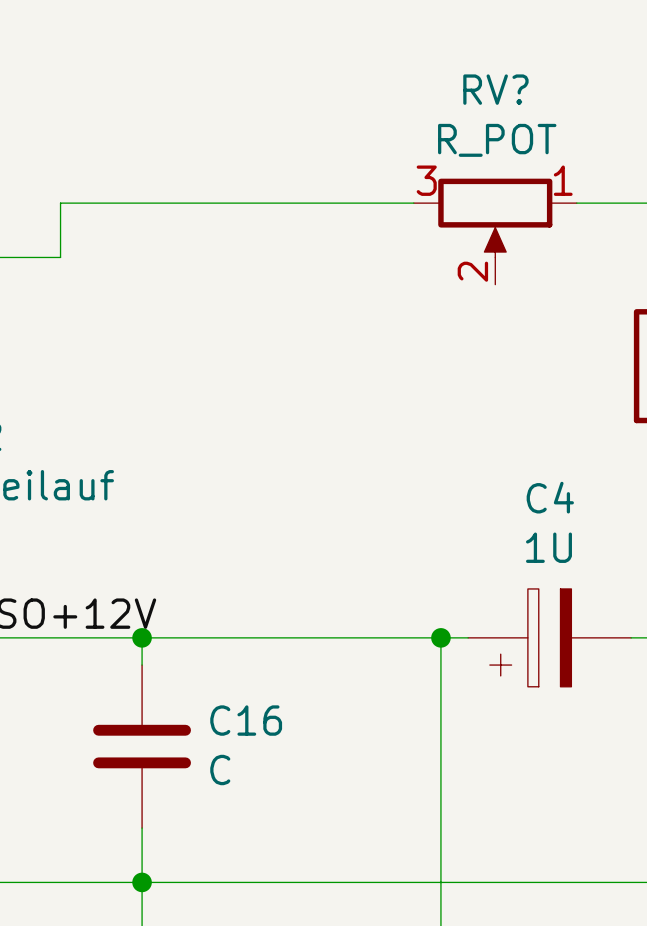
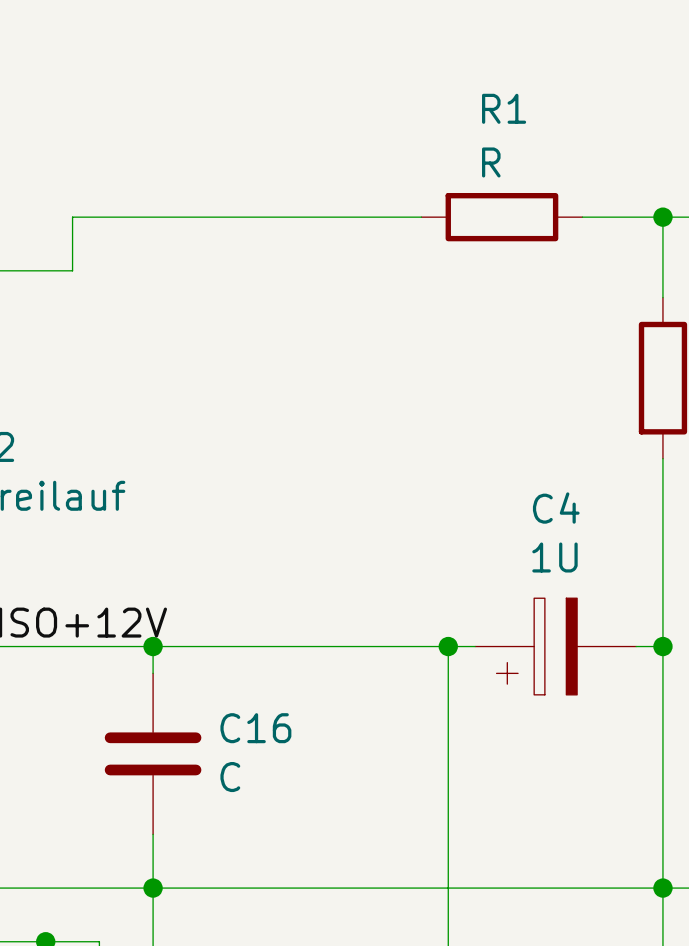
R1: none -> R (501, 217)
RV?: R_POT (495, 231) -> none

